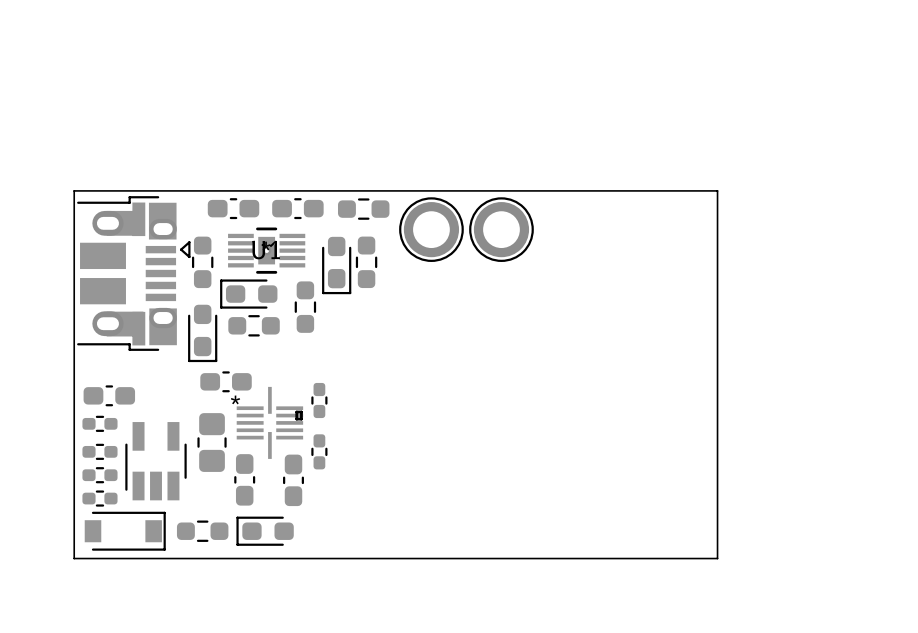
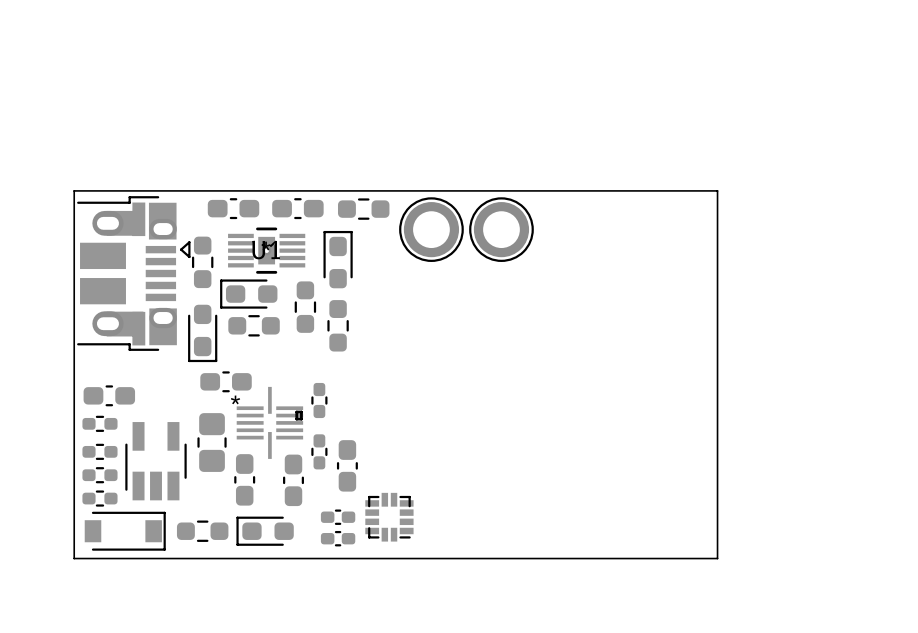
part position: (366, 262) -> (338, 325)
part rotation: 0° (336, 265) -> 180° (338, 259)
part: none -> (347, 465)
part: none -> (338, 517)
part: none -> (389, 517)
part: none -> (338, 538)

